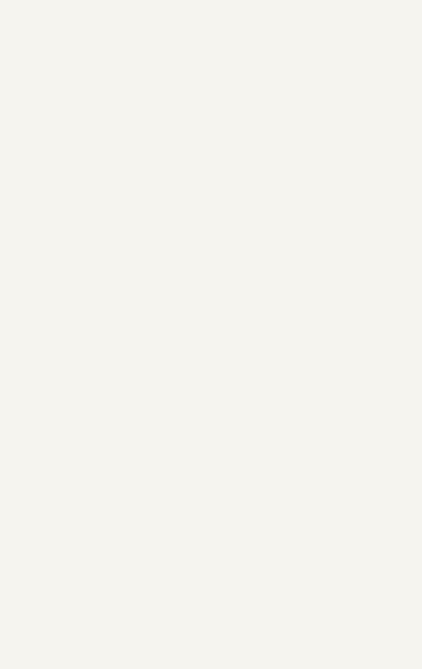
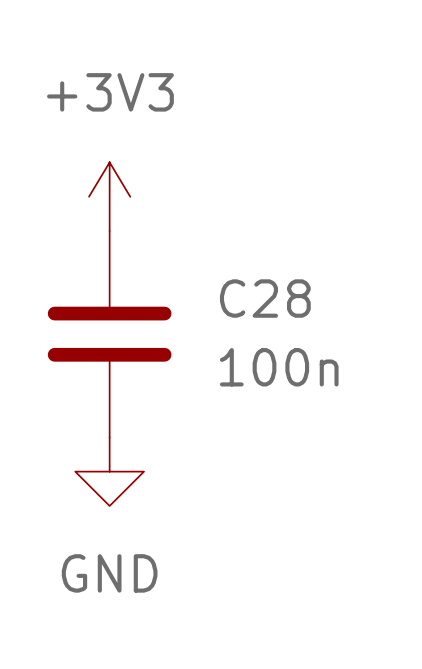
power symbol: none -> +3V3 (109, 196)
C28: none -> 100n (109, 334)
power symbol: none -> GND (109, 471)

